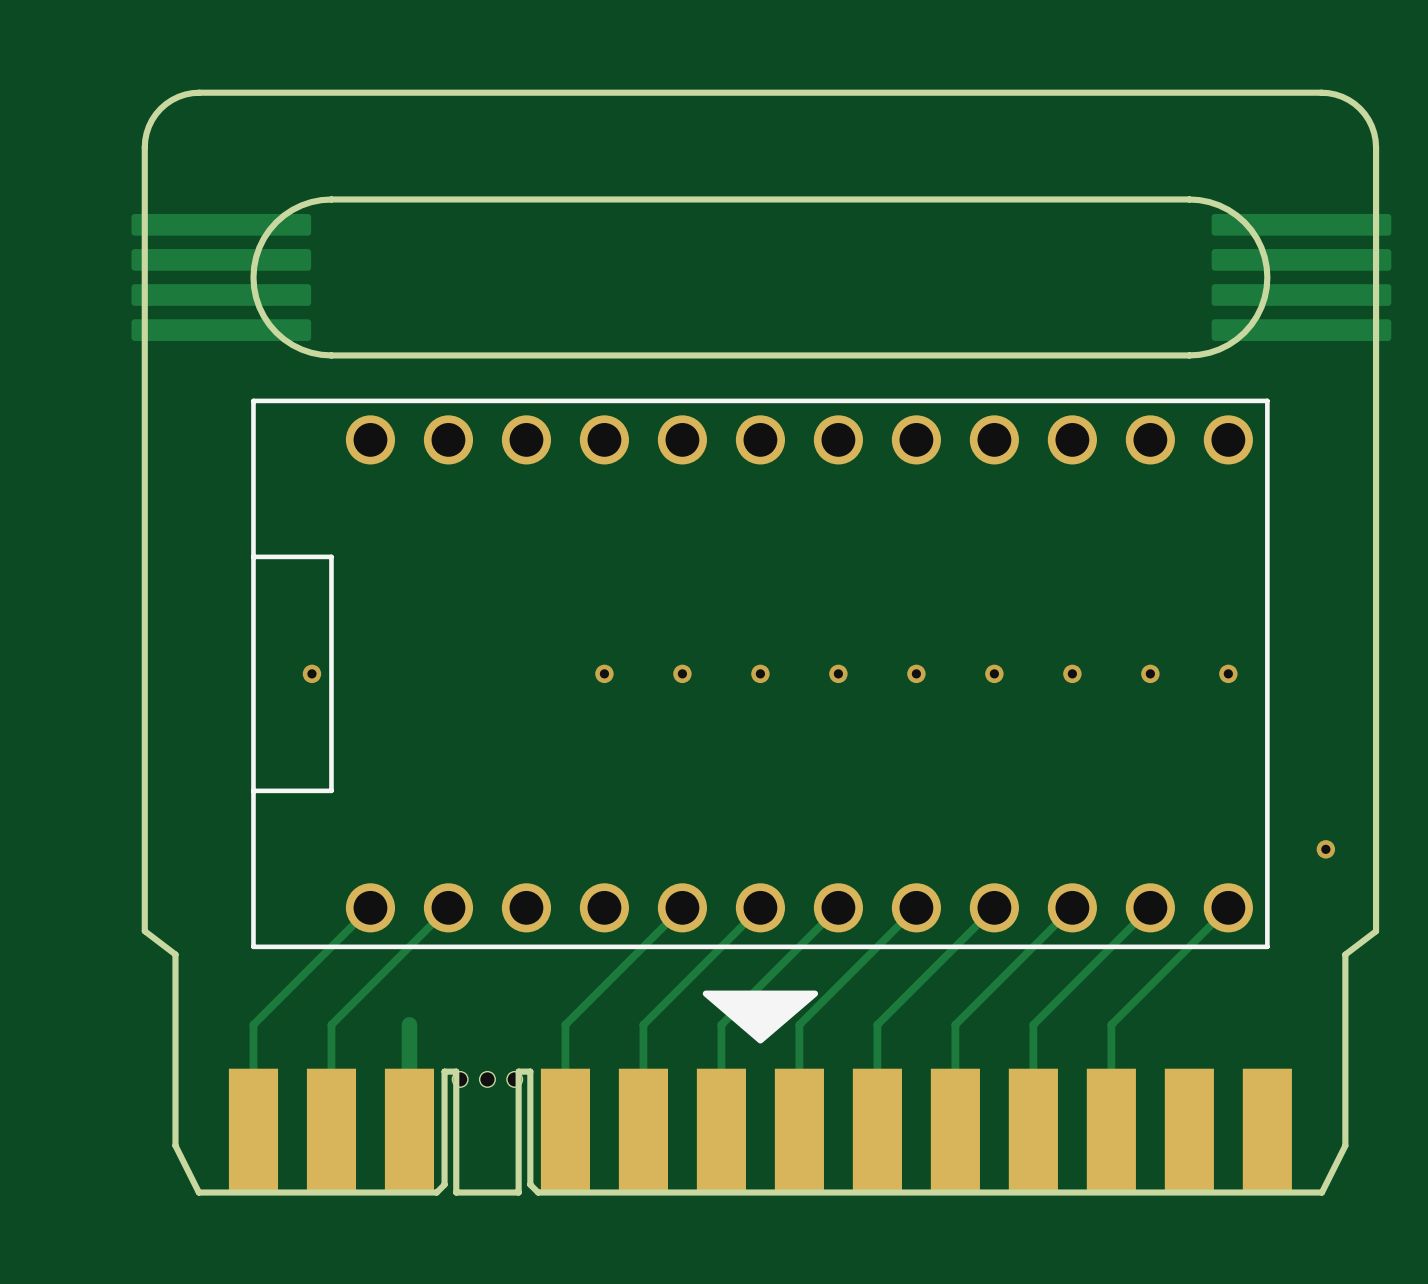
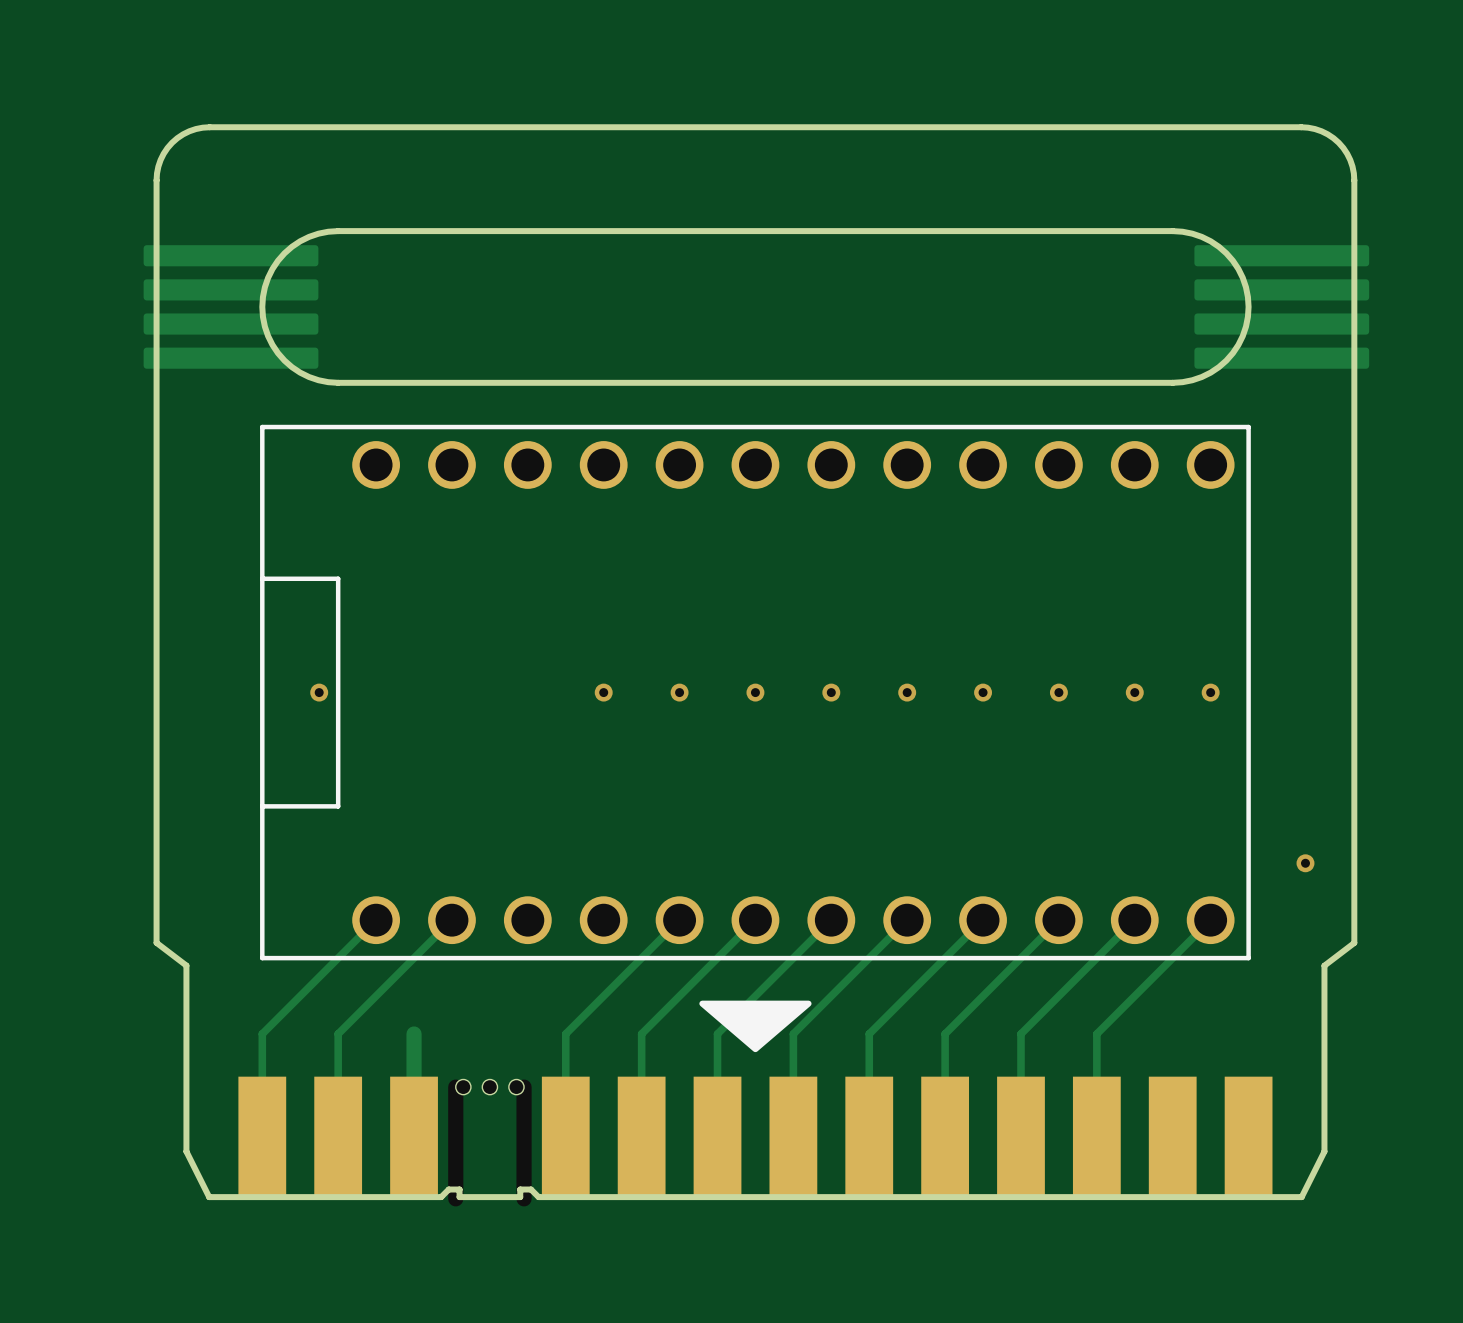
part: none -> (455, 1142)
part: none -> (524, 1142)
board edge: (456, 1184) (456, 1071) (444, 1071) (444, 1184) (436, 1192) -> (459, 1189) (448, 1189) (441, 1197)
board edge: (518, 1184) (518, 1071) (530, 1071) (530, 1184) (538, 1192) -> (520, 1189) (531, 1189) (538, 1197)

